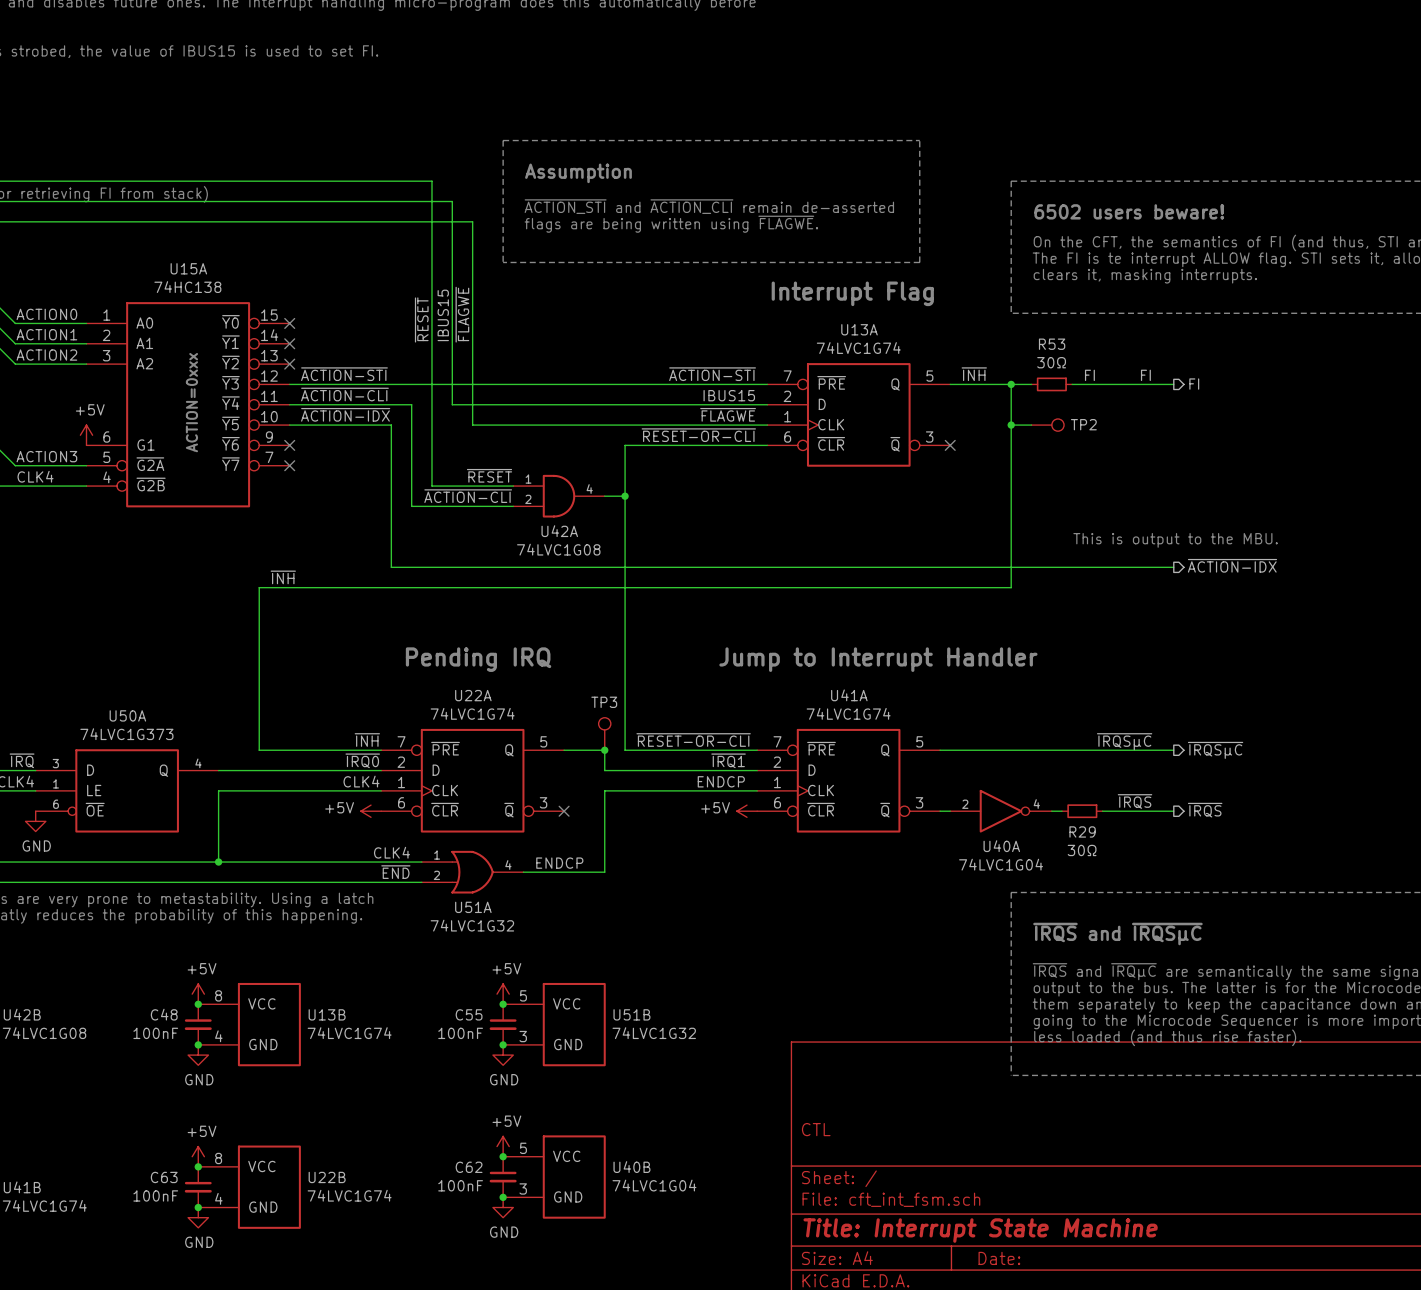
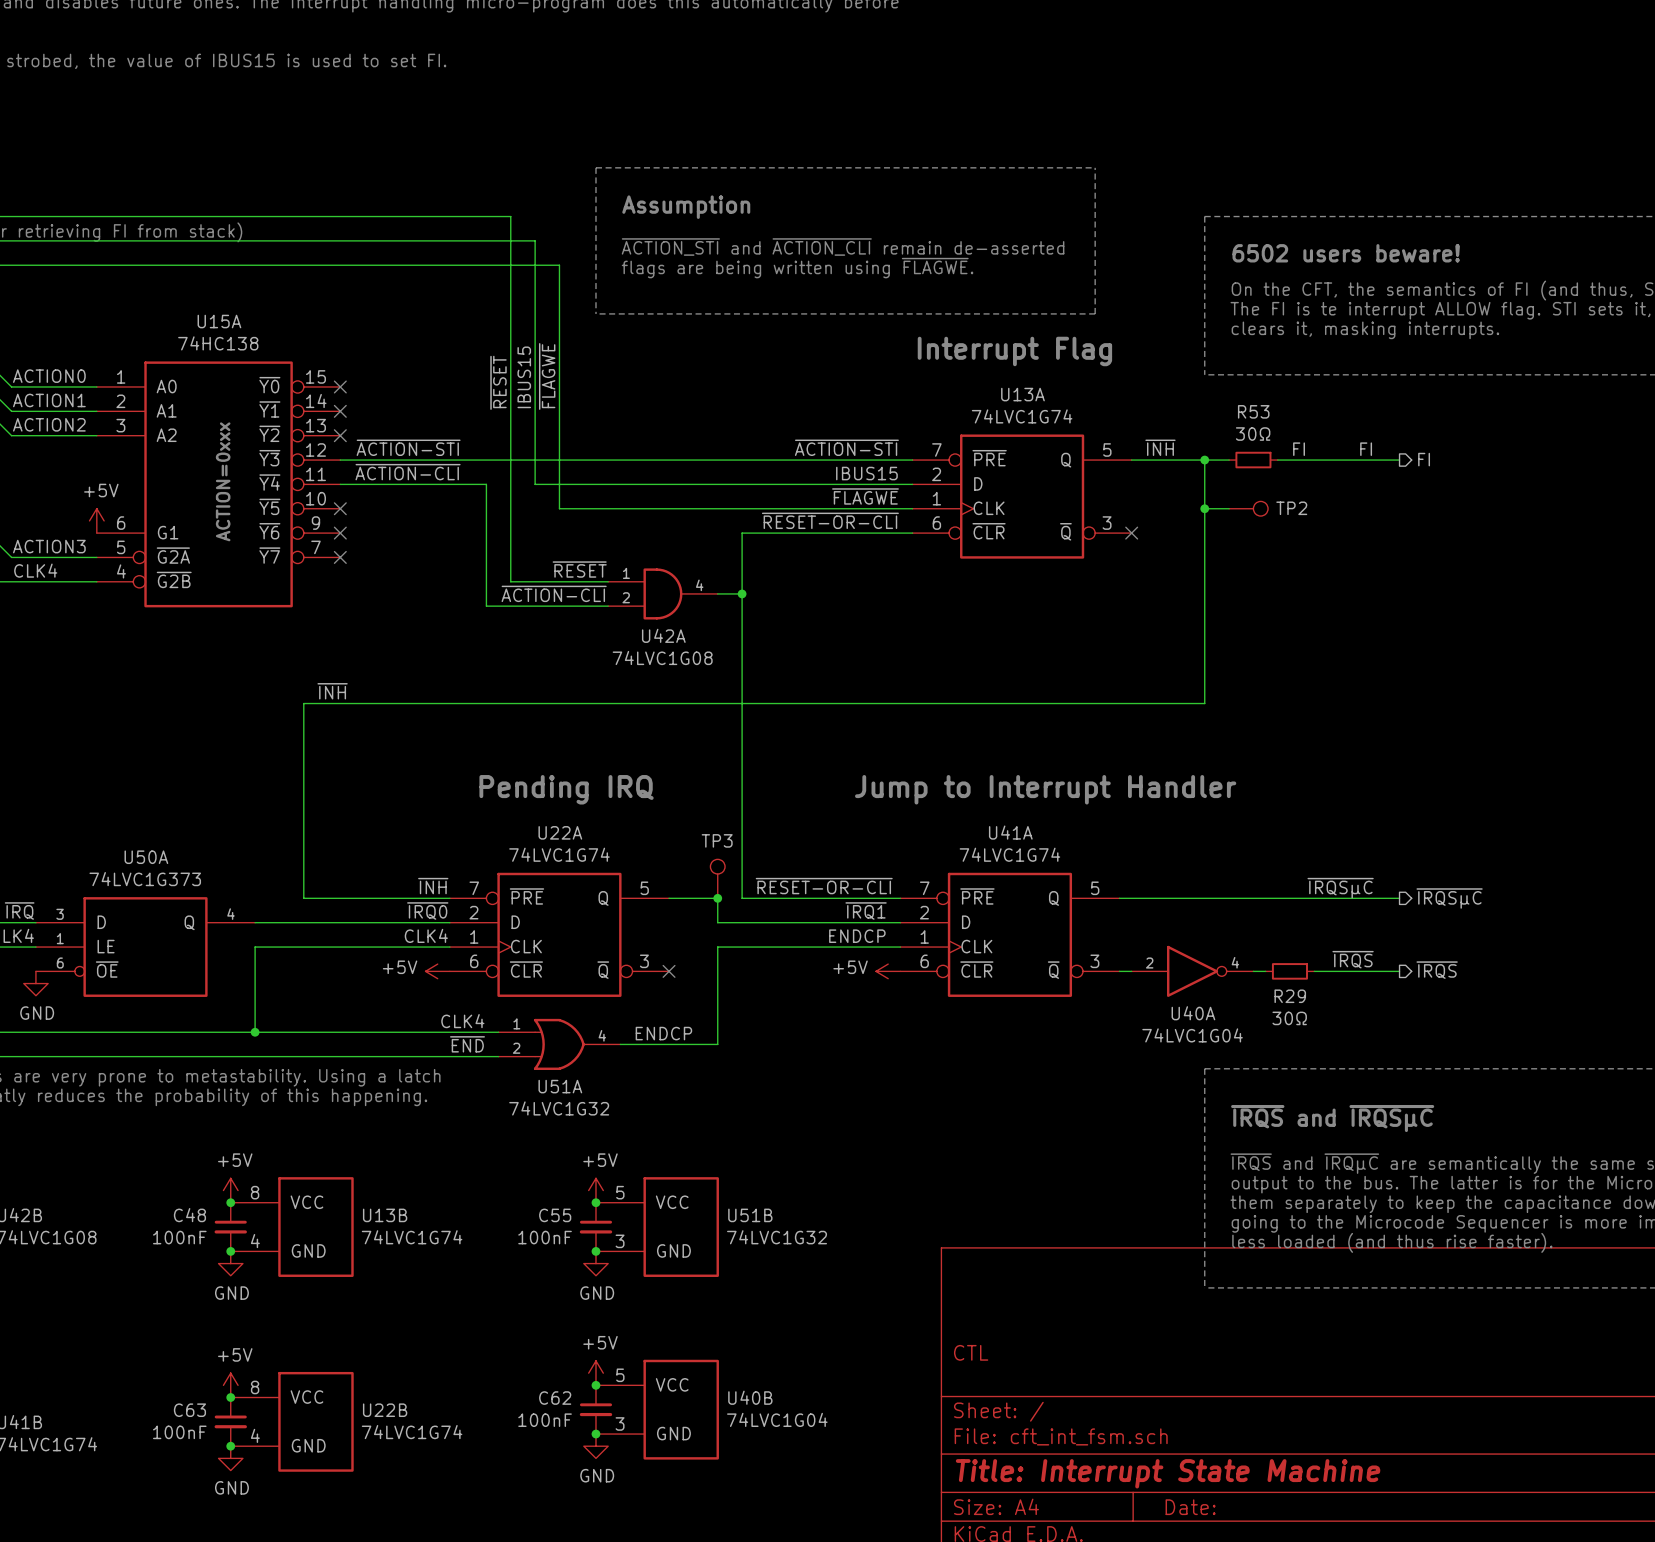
label position: ~{ACTION-STI} (344, 374) -> ~{ACTION-STI} (408, 447)
label position: ~{ACTION-CLI} (344, 394) -> ~{ACTION-CLI} (408, 472)
label: ~{ACTION-IDX} (345, 414) -> none
wire: (289, 425) (391, 425) (391, 567) (1173, 567) -> none
no-connect mark: none -> (340, 508)
text: This is output to the MBU. (1175, 540) -> none
hierarchical label: ~{ACTION-IDX} (1232, 565) -> none

